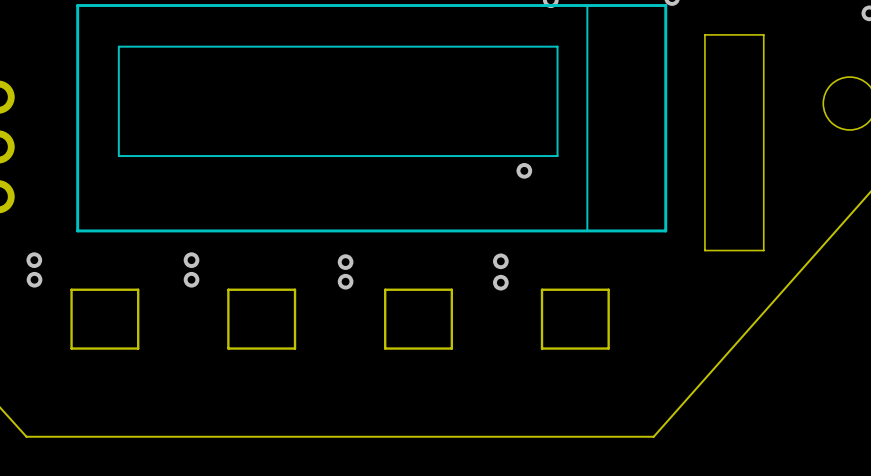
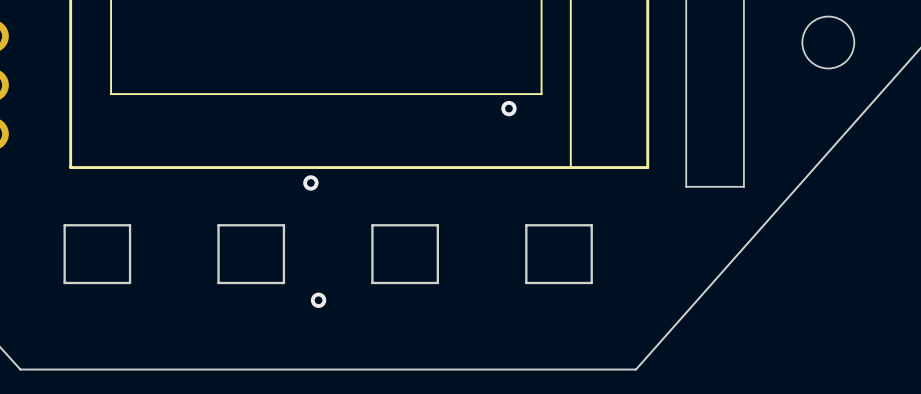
via: none -> (310, 182)
via: (34, 260) -> none
via: (191, 260) -> none
via: (500, 261) -> none
via: (345, 262) -> none
via: (34, 279) -> none
via: (191, 279) -> none
via: (345, 281) -> none
via: (500, 282) -> none
via: none -> (318, 300)

